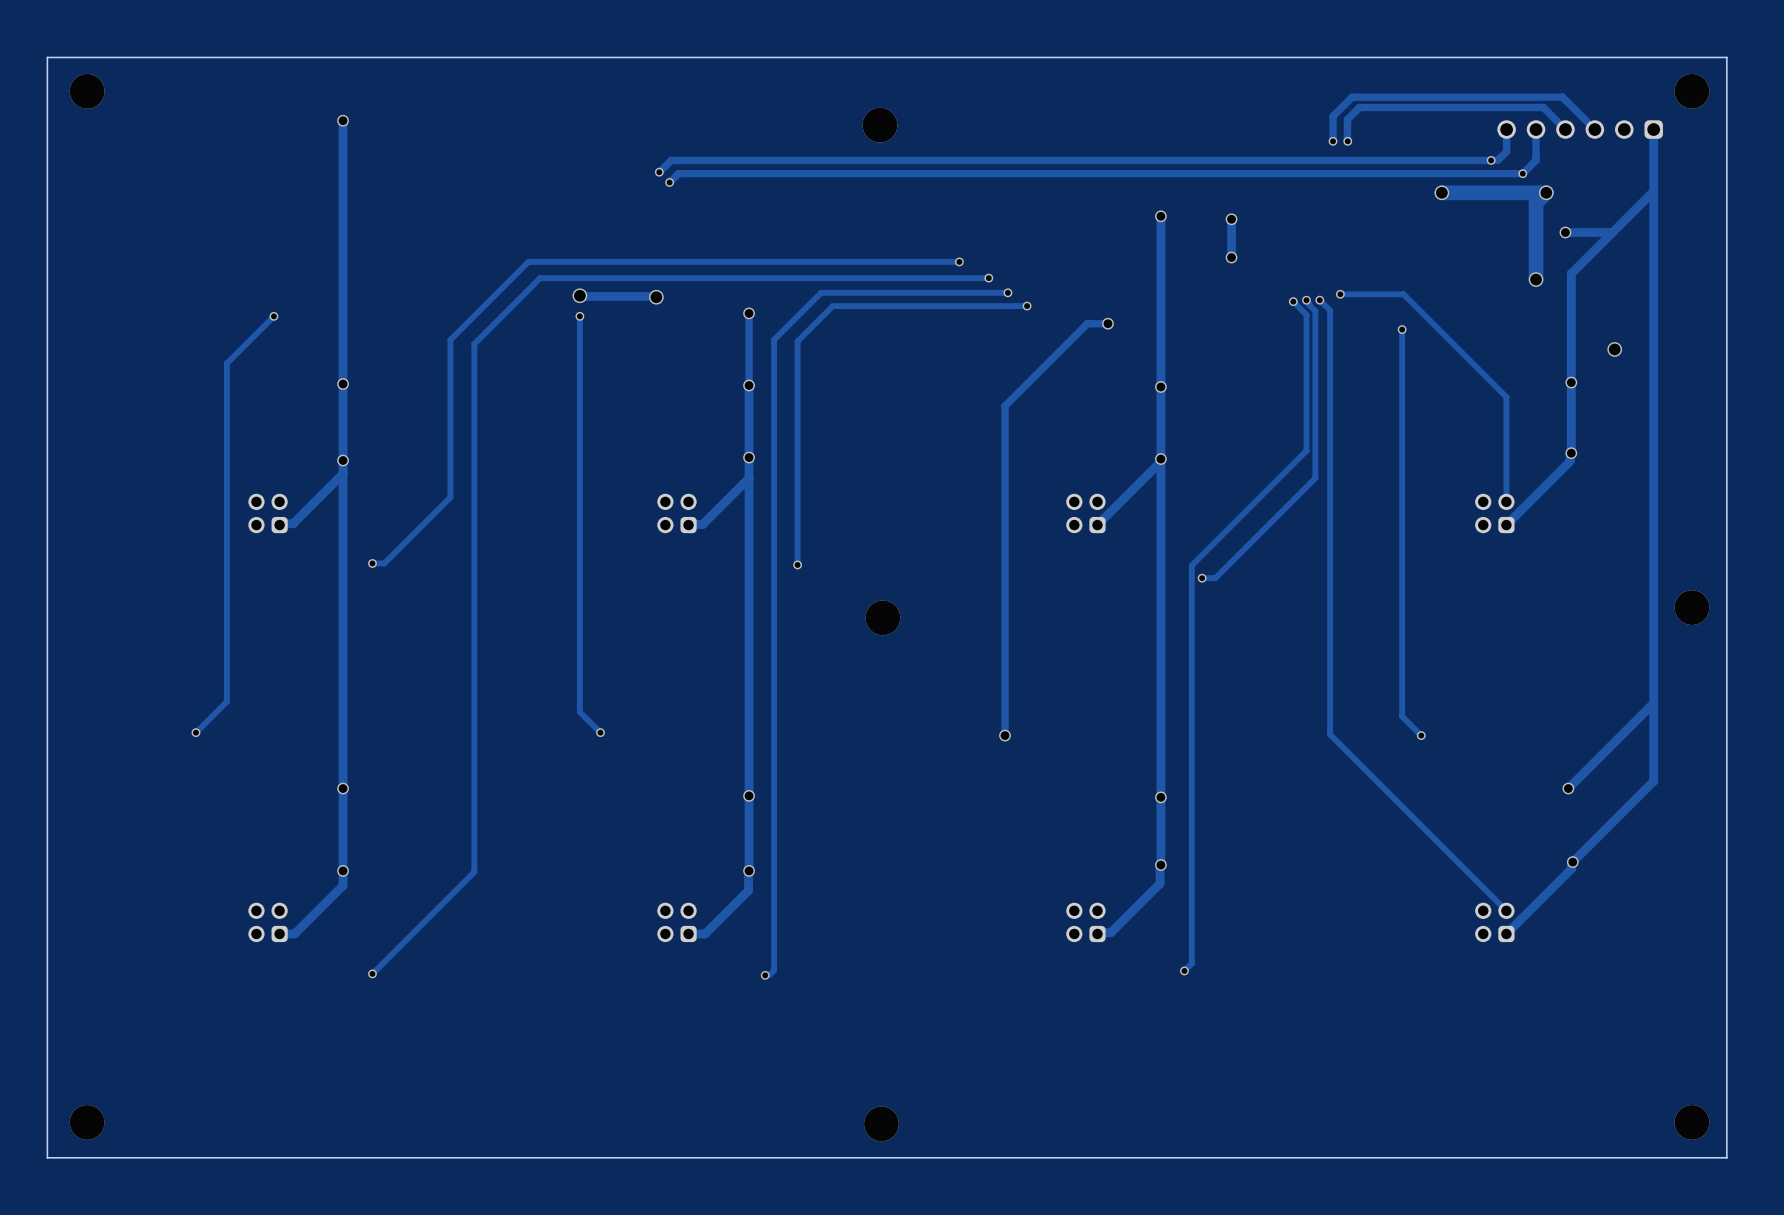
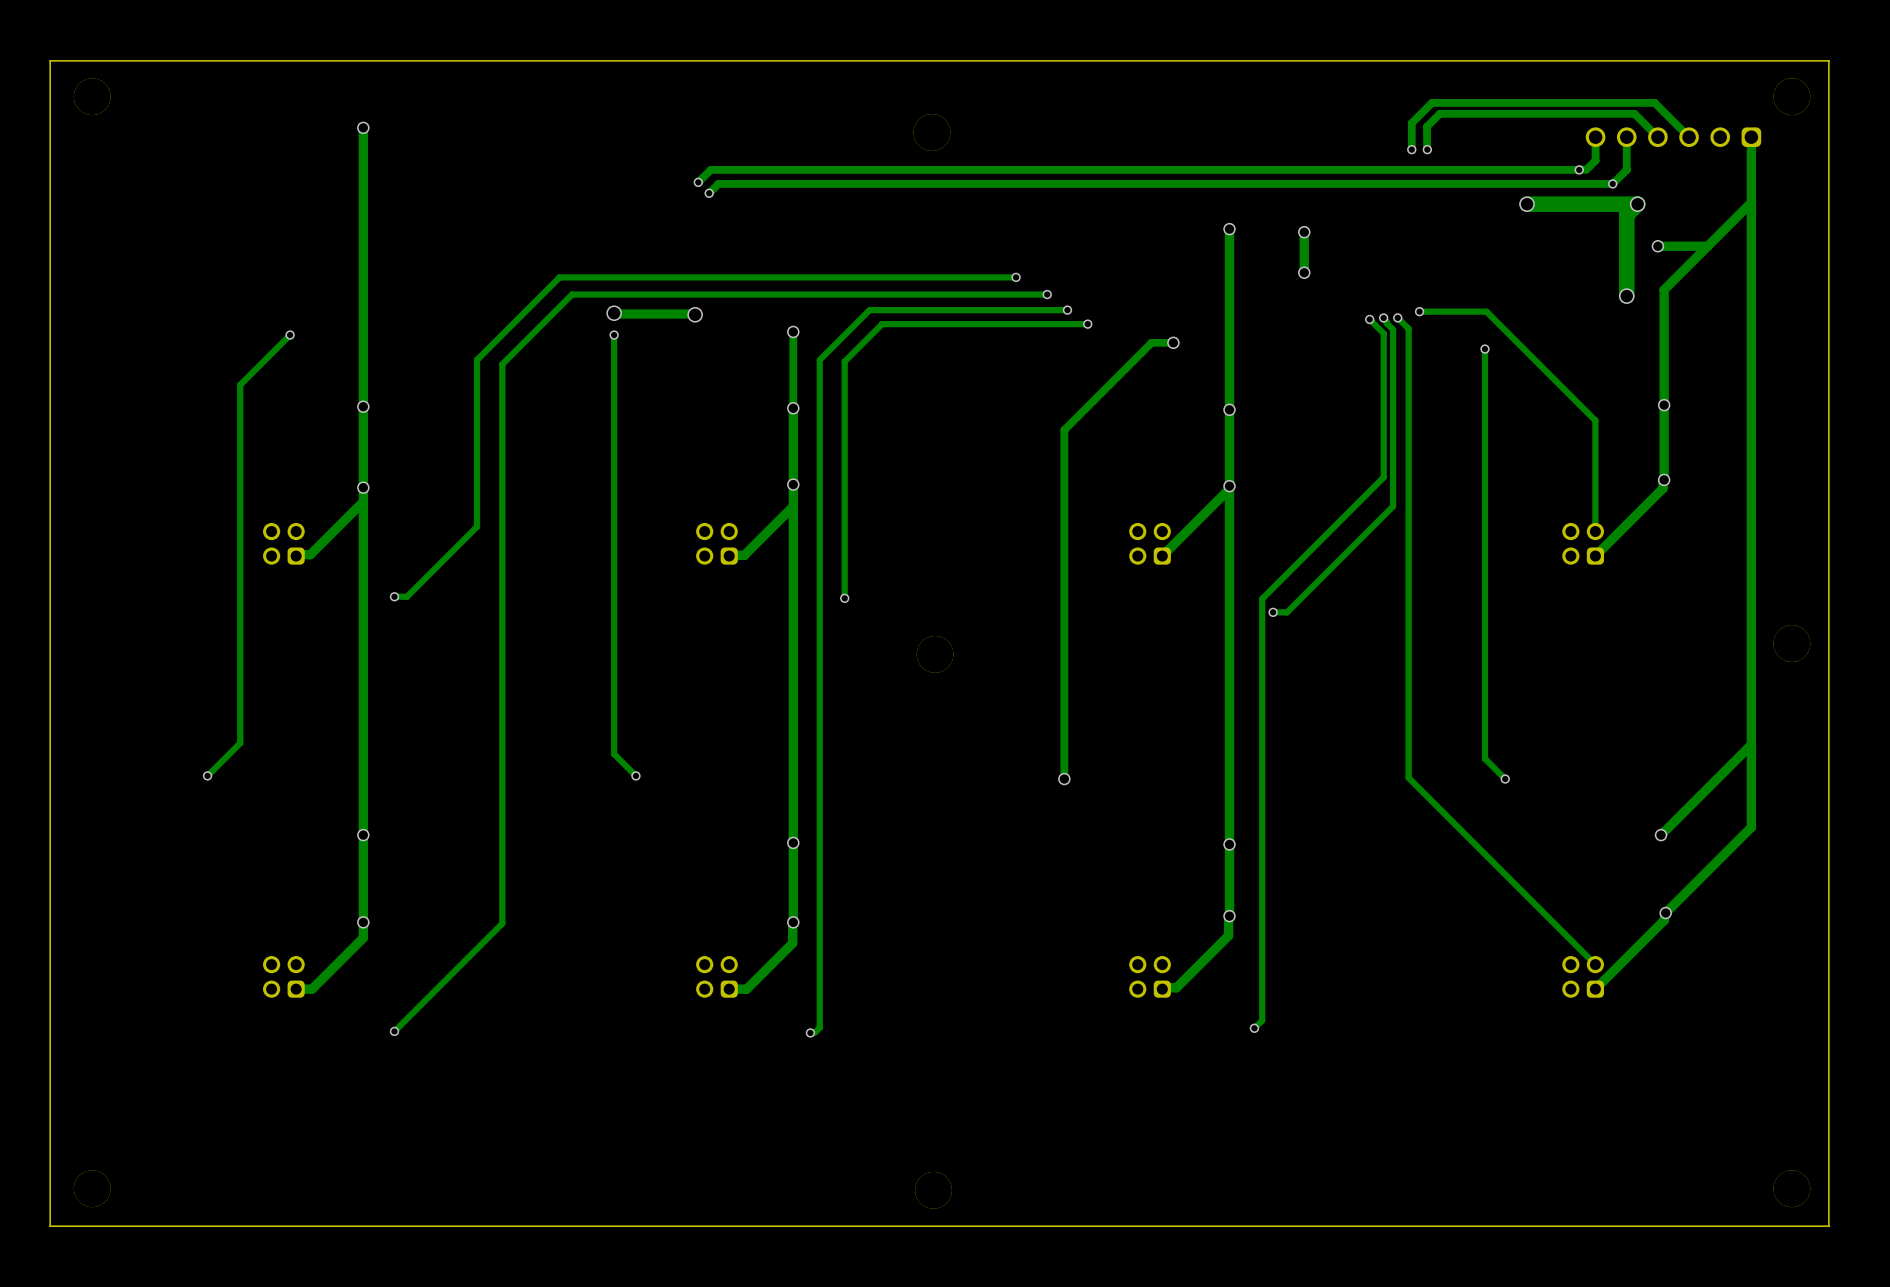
via: (1614, 349) -> none

